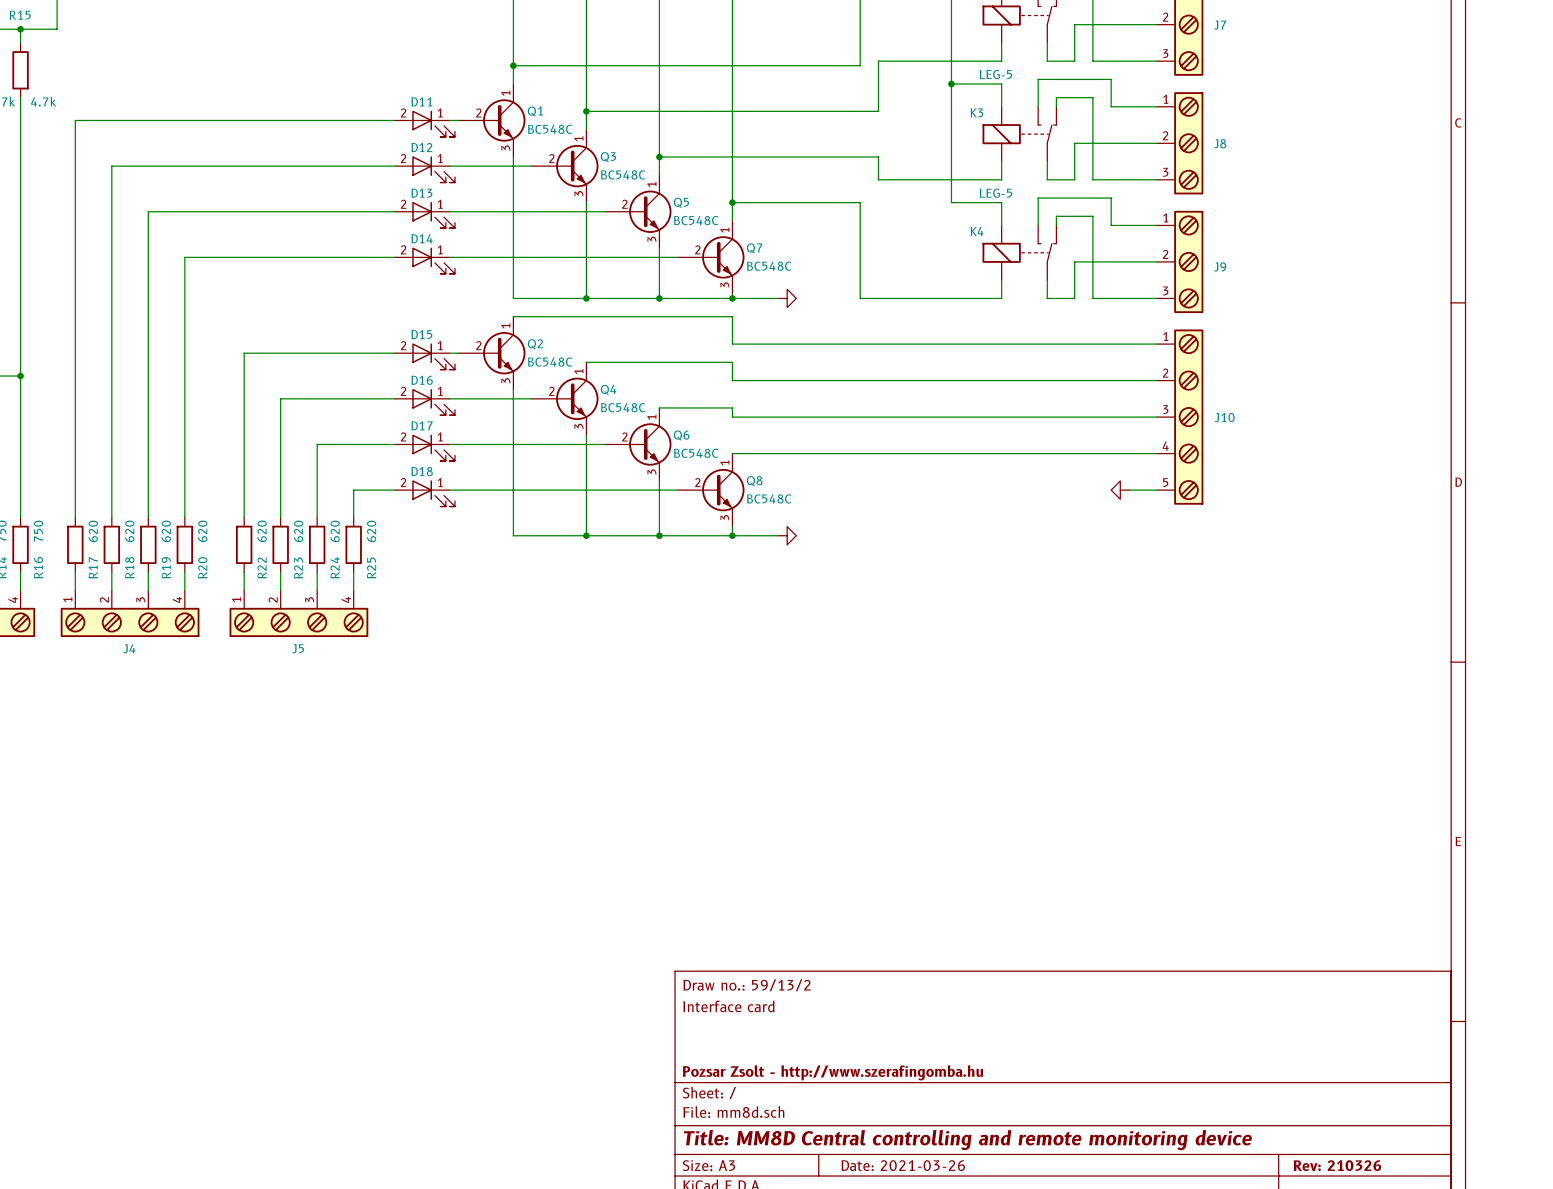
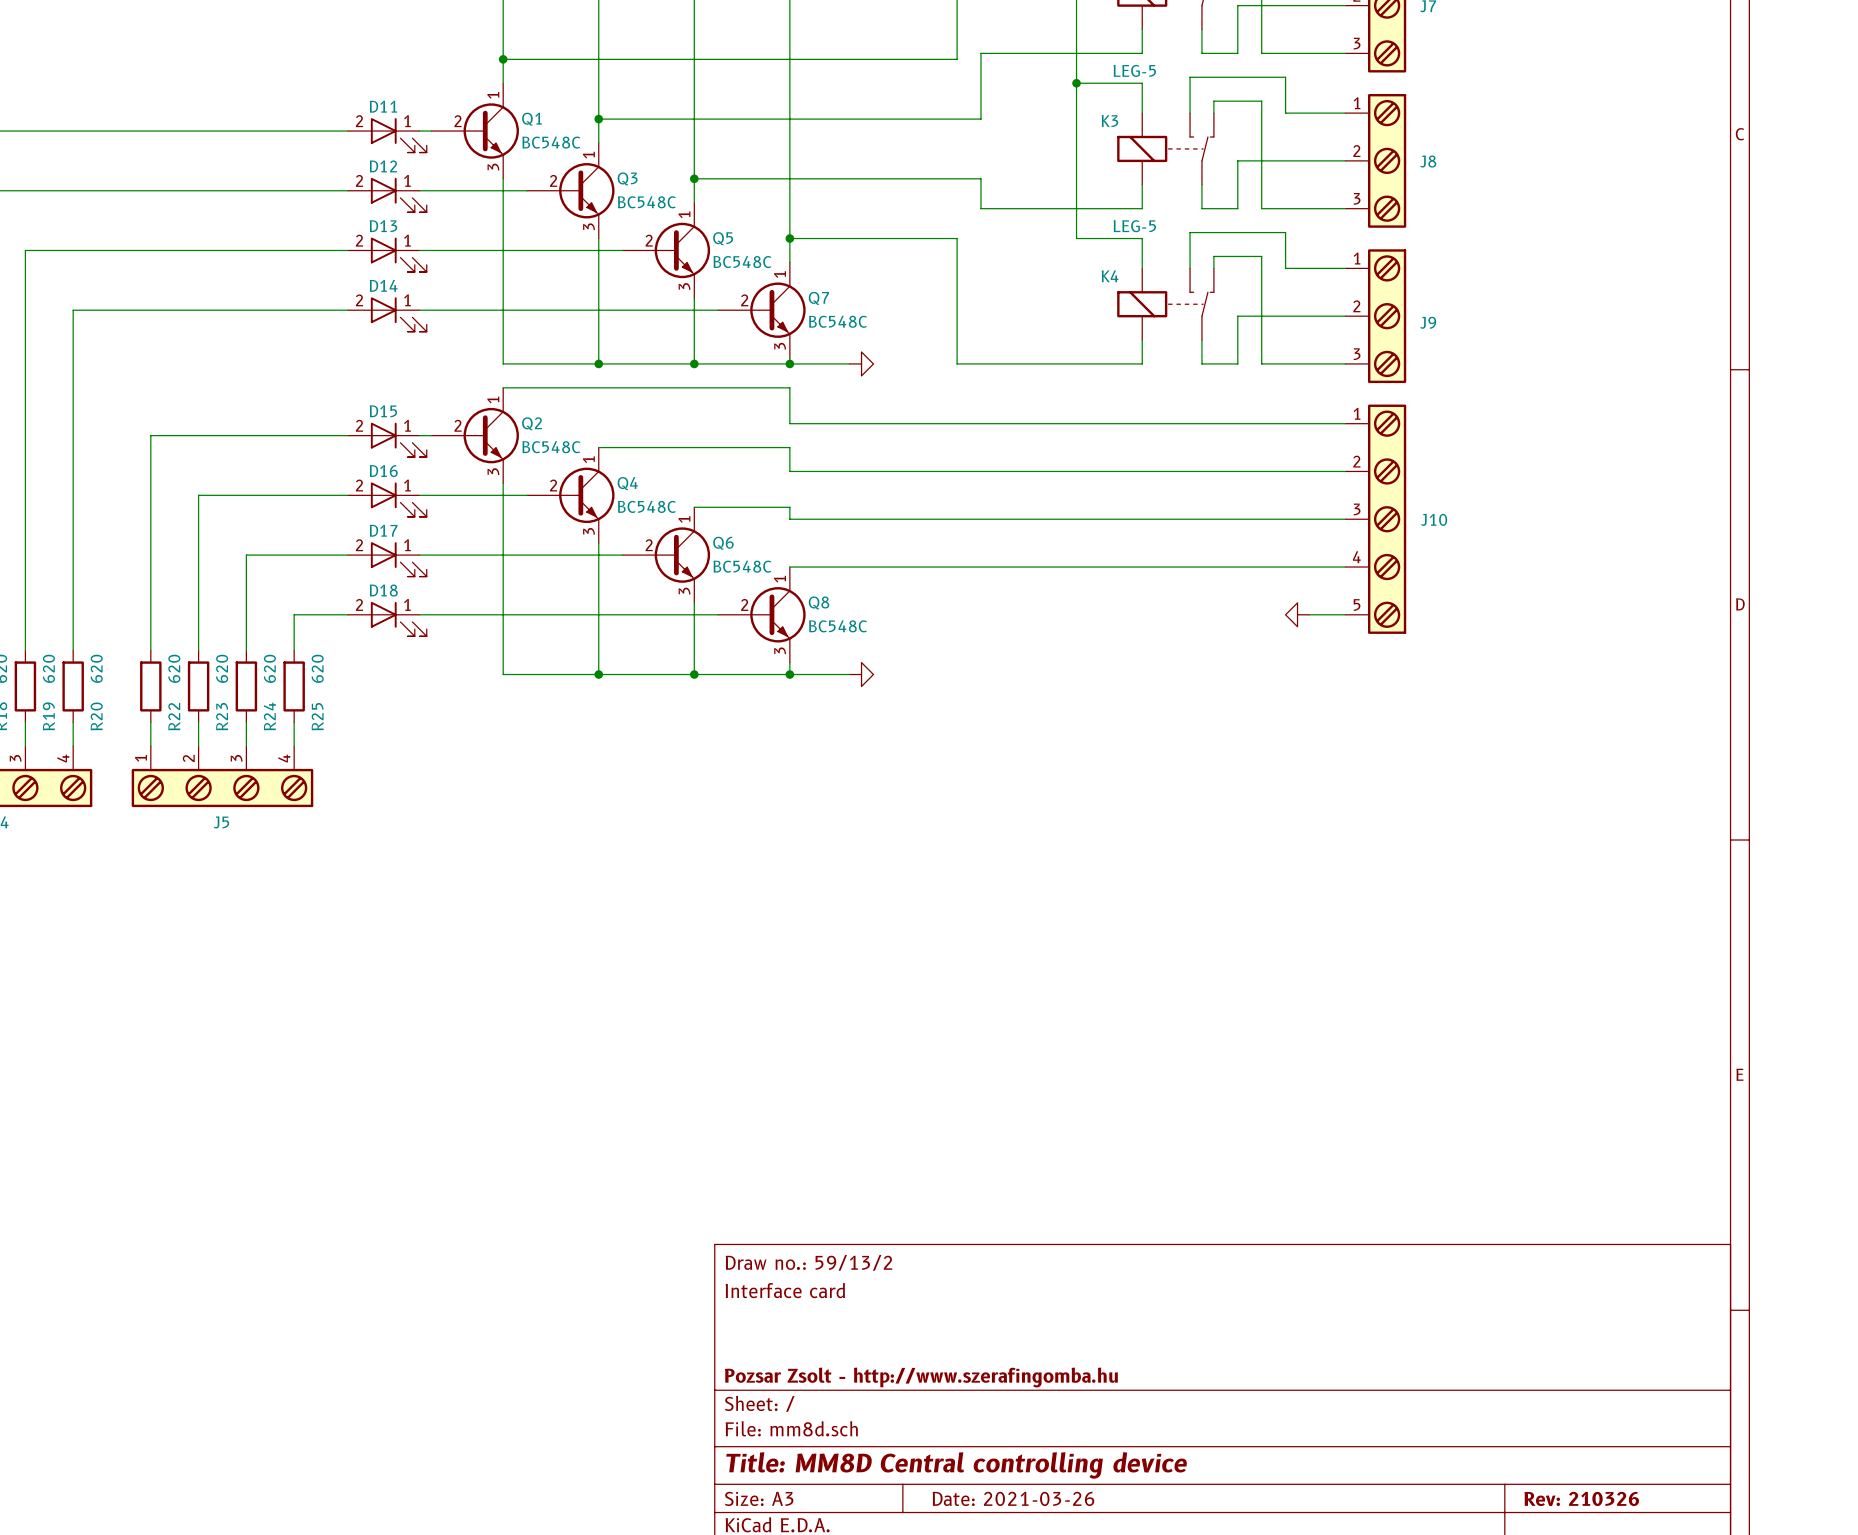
title block: Title: MM8D Central controlling and remote monitoring device (967, 1140) -> Title: MM8D Central controlling device (956, 1465)

